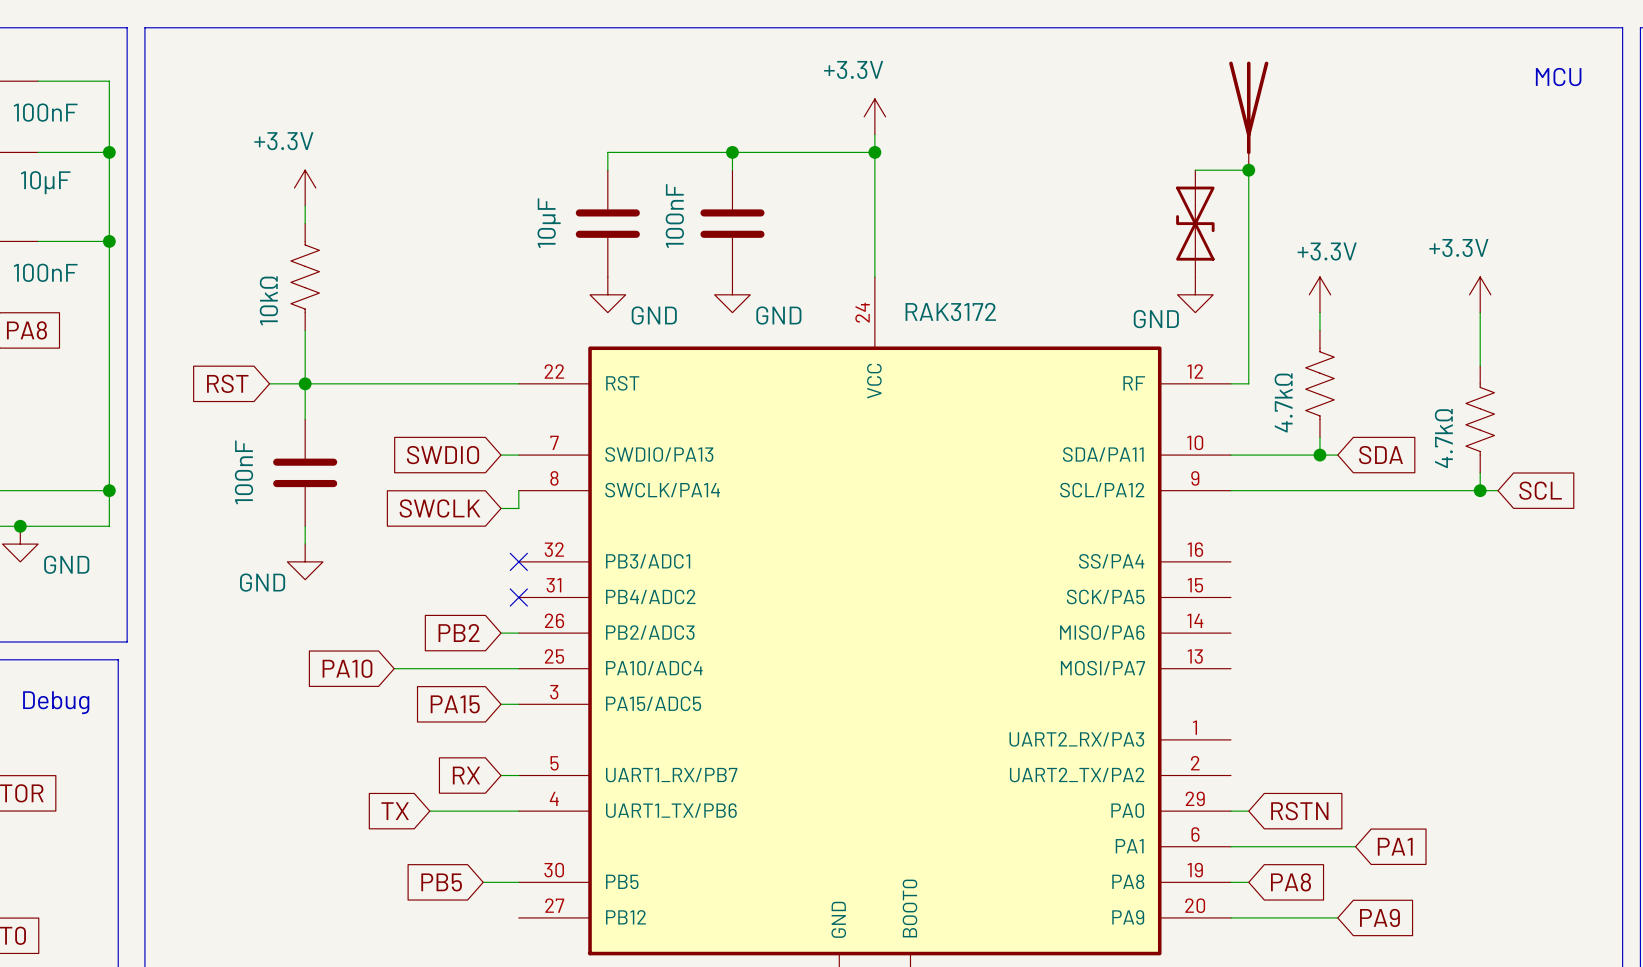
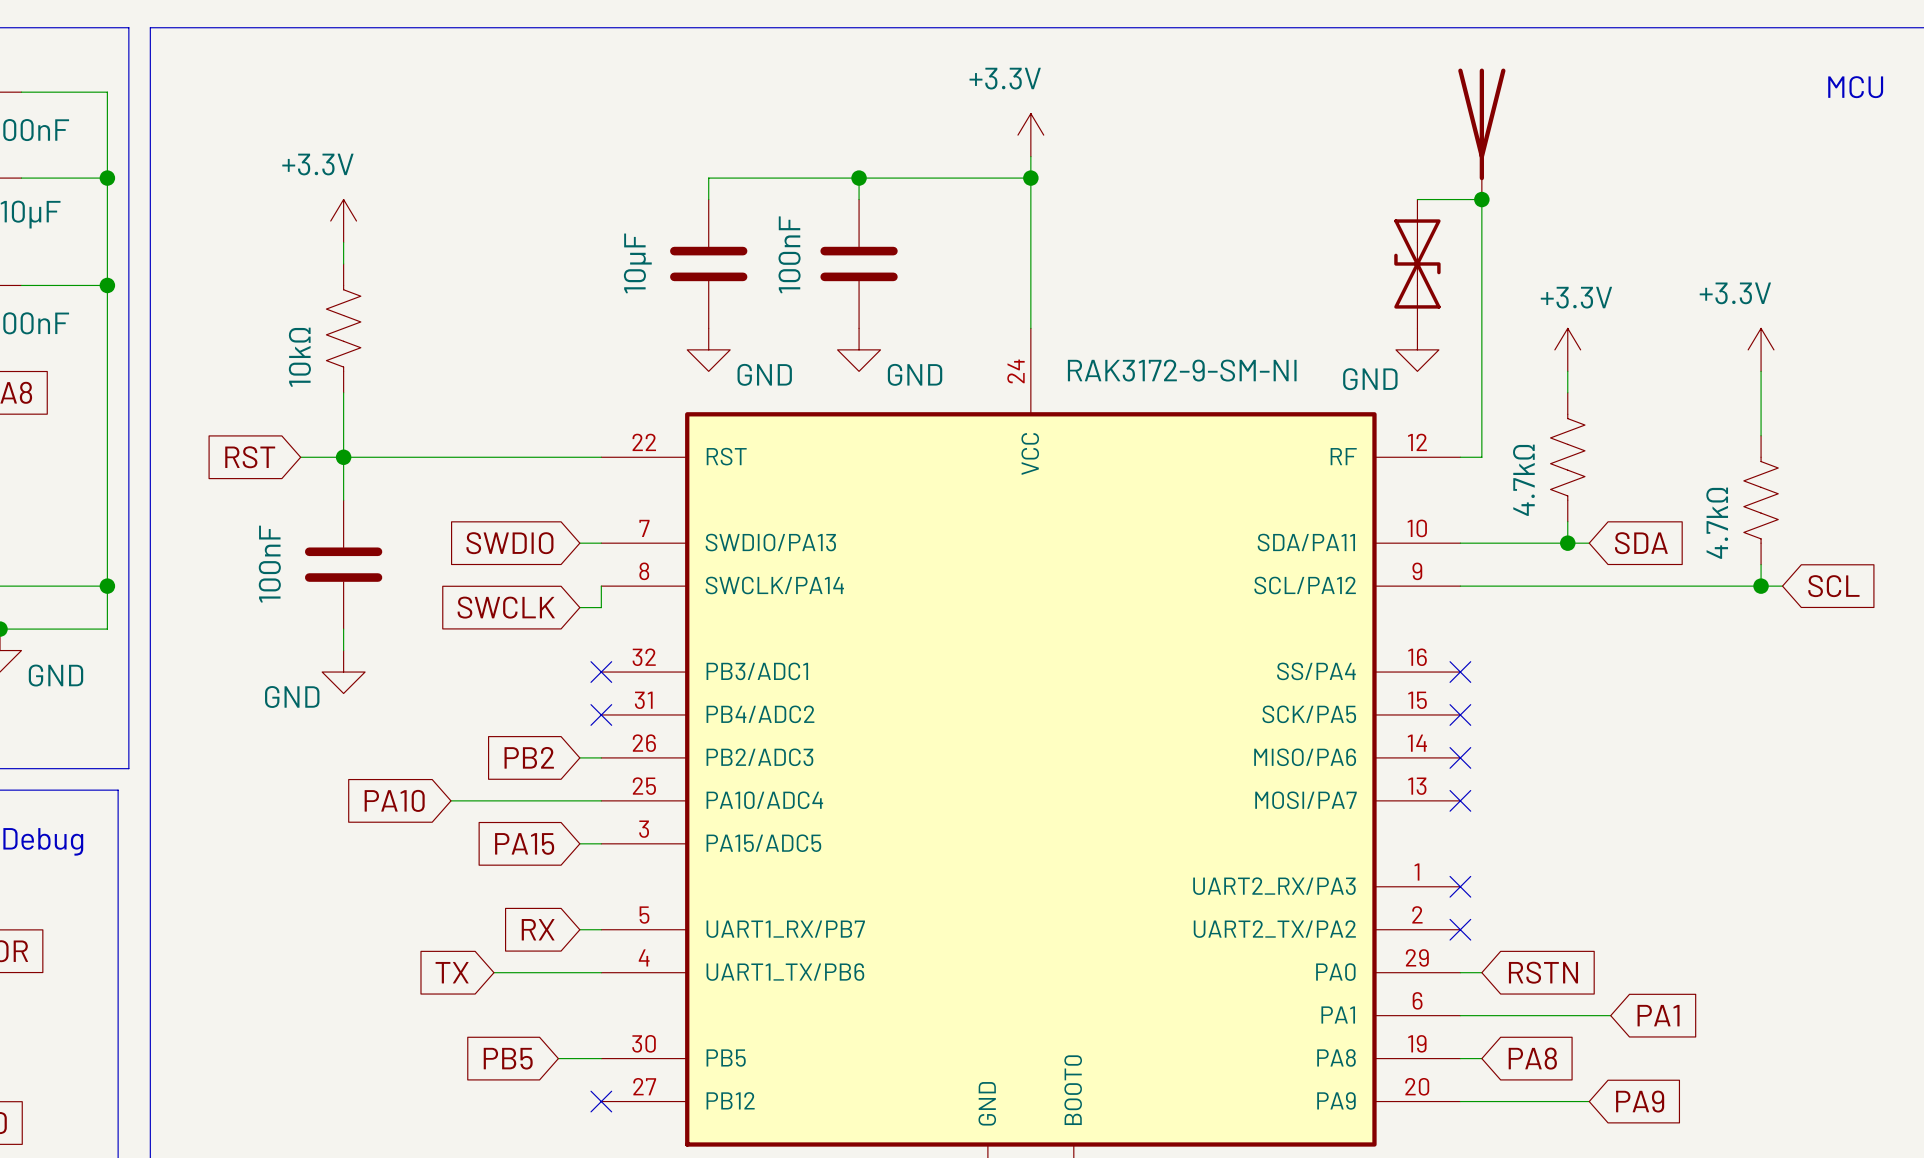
part value: RAK3172 (950, 311) -> RAK3172-9-SM-NI (1182, 370)
no-connect mark: none -> (1460, 672)
no-connect mark: none -> (1460, 714)
no-connect mark: none -> (1460, 757)
no-connect mark: none -> (1460, 800)
no-connect mark: none -> (1460, 886)
no-connect mark: none -> (1460, 929)
no-connect mark: none -> (601, 1101)

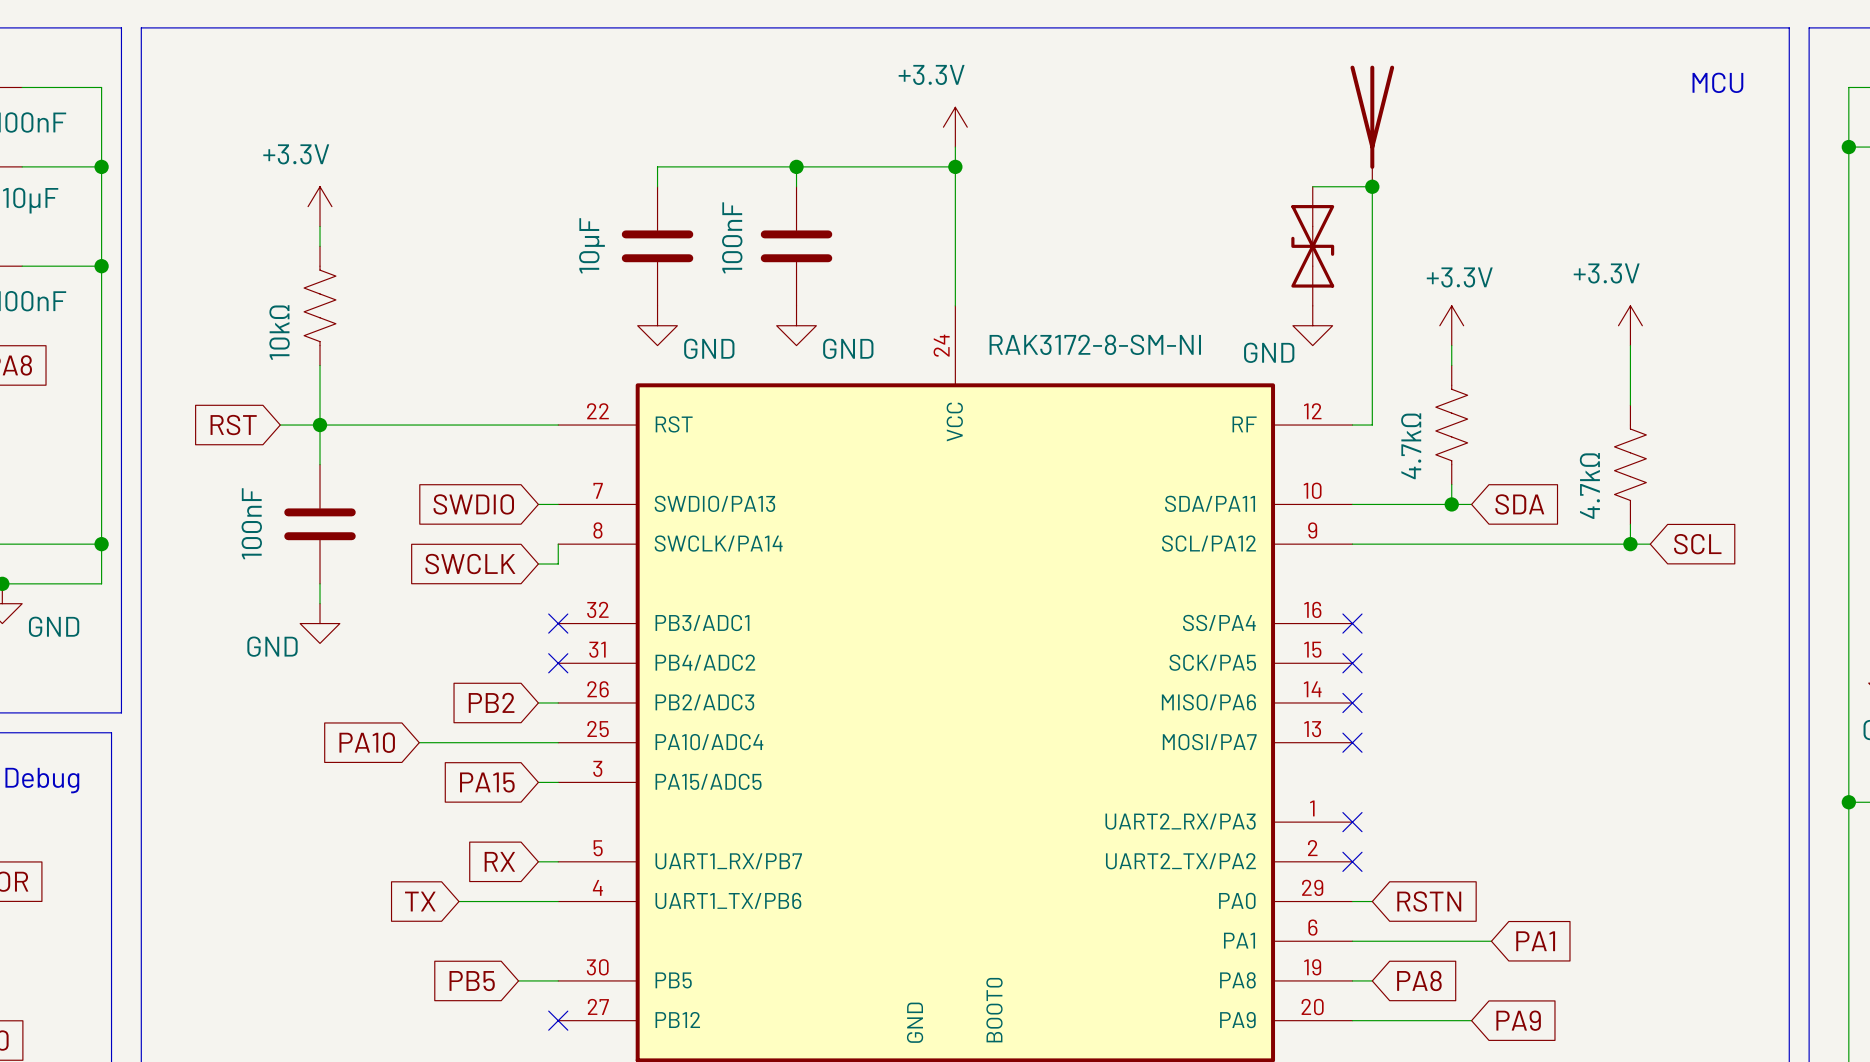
part value: RAK3172-9-SM-NI (1182, 370) -> RAK3172-8-SM-NI (1095, 344)

